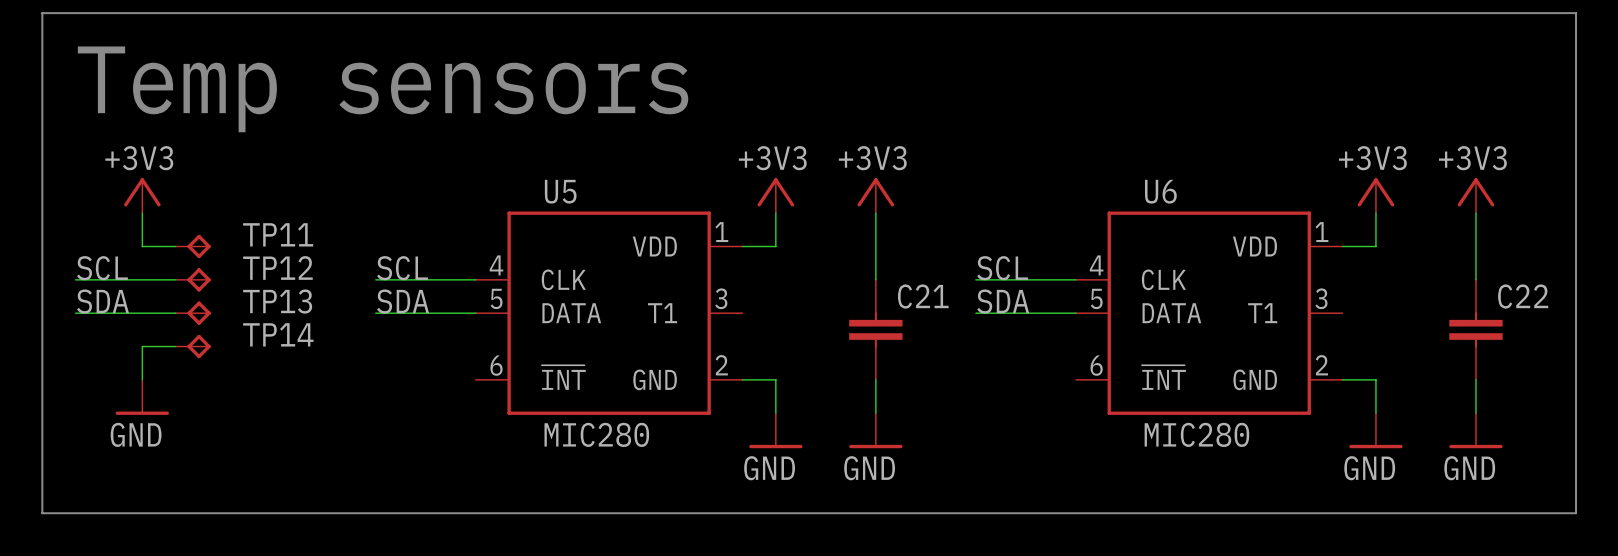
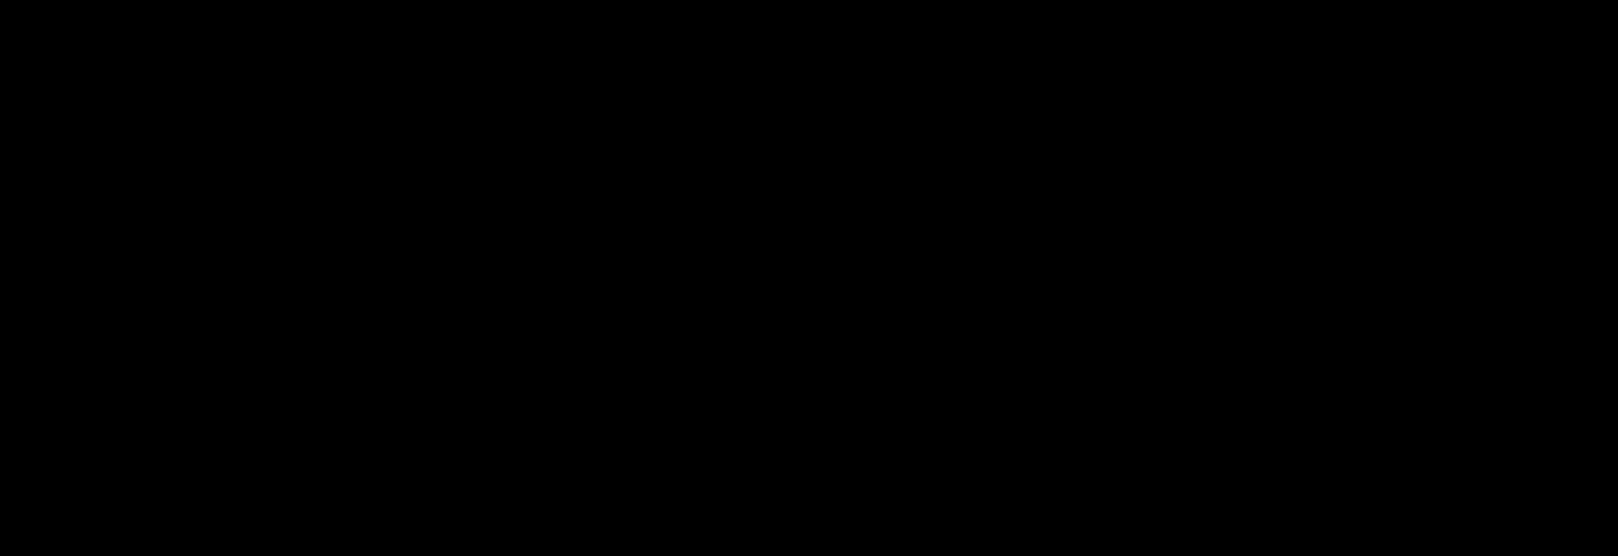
line: (42, 13) (42, 513) (1576, 513) (1576, 13) (42, 13) -> none
text: Temp sensors (383, 89) -> none
power symbol: +3V3 (142, 195) -> none
power symbol: +3V3 (775, 195) -> none
power symbol: +3V3 (875, 195) -> none
power symbol: +3V3 (1375, 195) -> none
power symbol: +3V3 (1475, 195) -> none
wire: (142, 213) (142, 246) (175, 246) -> none
wire: (775, 213) (775, 246) (742, 246) -> none
wire: (875, 213) (875, 279) -> none
wire: (1375, 213) (1375, 246) (1342, 246) -> none
wire: (1475, 213) (1475, 279) -> none
TP11: (193, 246) -> none
label: SCL (102, 268) -> none
label: SCL (402, 268) -> none
label: SCL (1002, 268) -> none
wire: (75, 279) (175, 279) -> none
TP12: (193, 279) -> none
wire: (375, 279) (475, 279) -> none
wire: (975, 279) (1075, 279) -> none
label: SDA (102, 301) -> none
label: SDA (403, 301) -> none
label: SDA (1003, 301) -> none
wire: (75, 313) (175, 313) -> none
TP13: (193, 313) -> none
wire: (375, 313) (475, 313) -> none
U5: MIC280 (609, 313) -> none
wire: (975, 313) (1075, 313) -> none
U6: MIC280 (1209, 313) -> none
C21: (875, 329) -> none
C22: (1475, 329) -> none
wire: (175, 346) (142, 346) (142, 379) -> none
TP14: (193, 346) -> none
wire: (742, 379) (775, 379) (775, 413) -> none
wire: (875, 379) (875, 413) -> none
wire: (1342, 379) (1375, 379) (1375, 413) -> none
wire: (1475, 379) (1475, 413) -> none
power symbol: GND (142, 397) -> none
power symbol: GND (775, 430) -> none
power symbol: GND (875, 430) -> none
power symbol: GND (1375, 430) -> none
power symbol: GND (1475, 430) -> none

